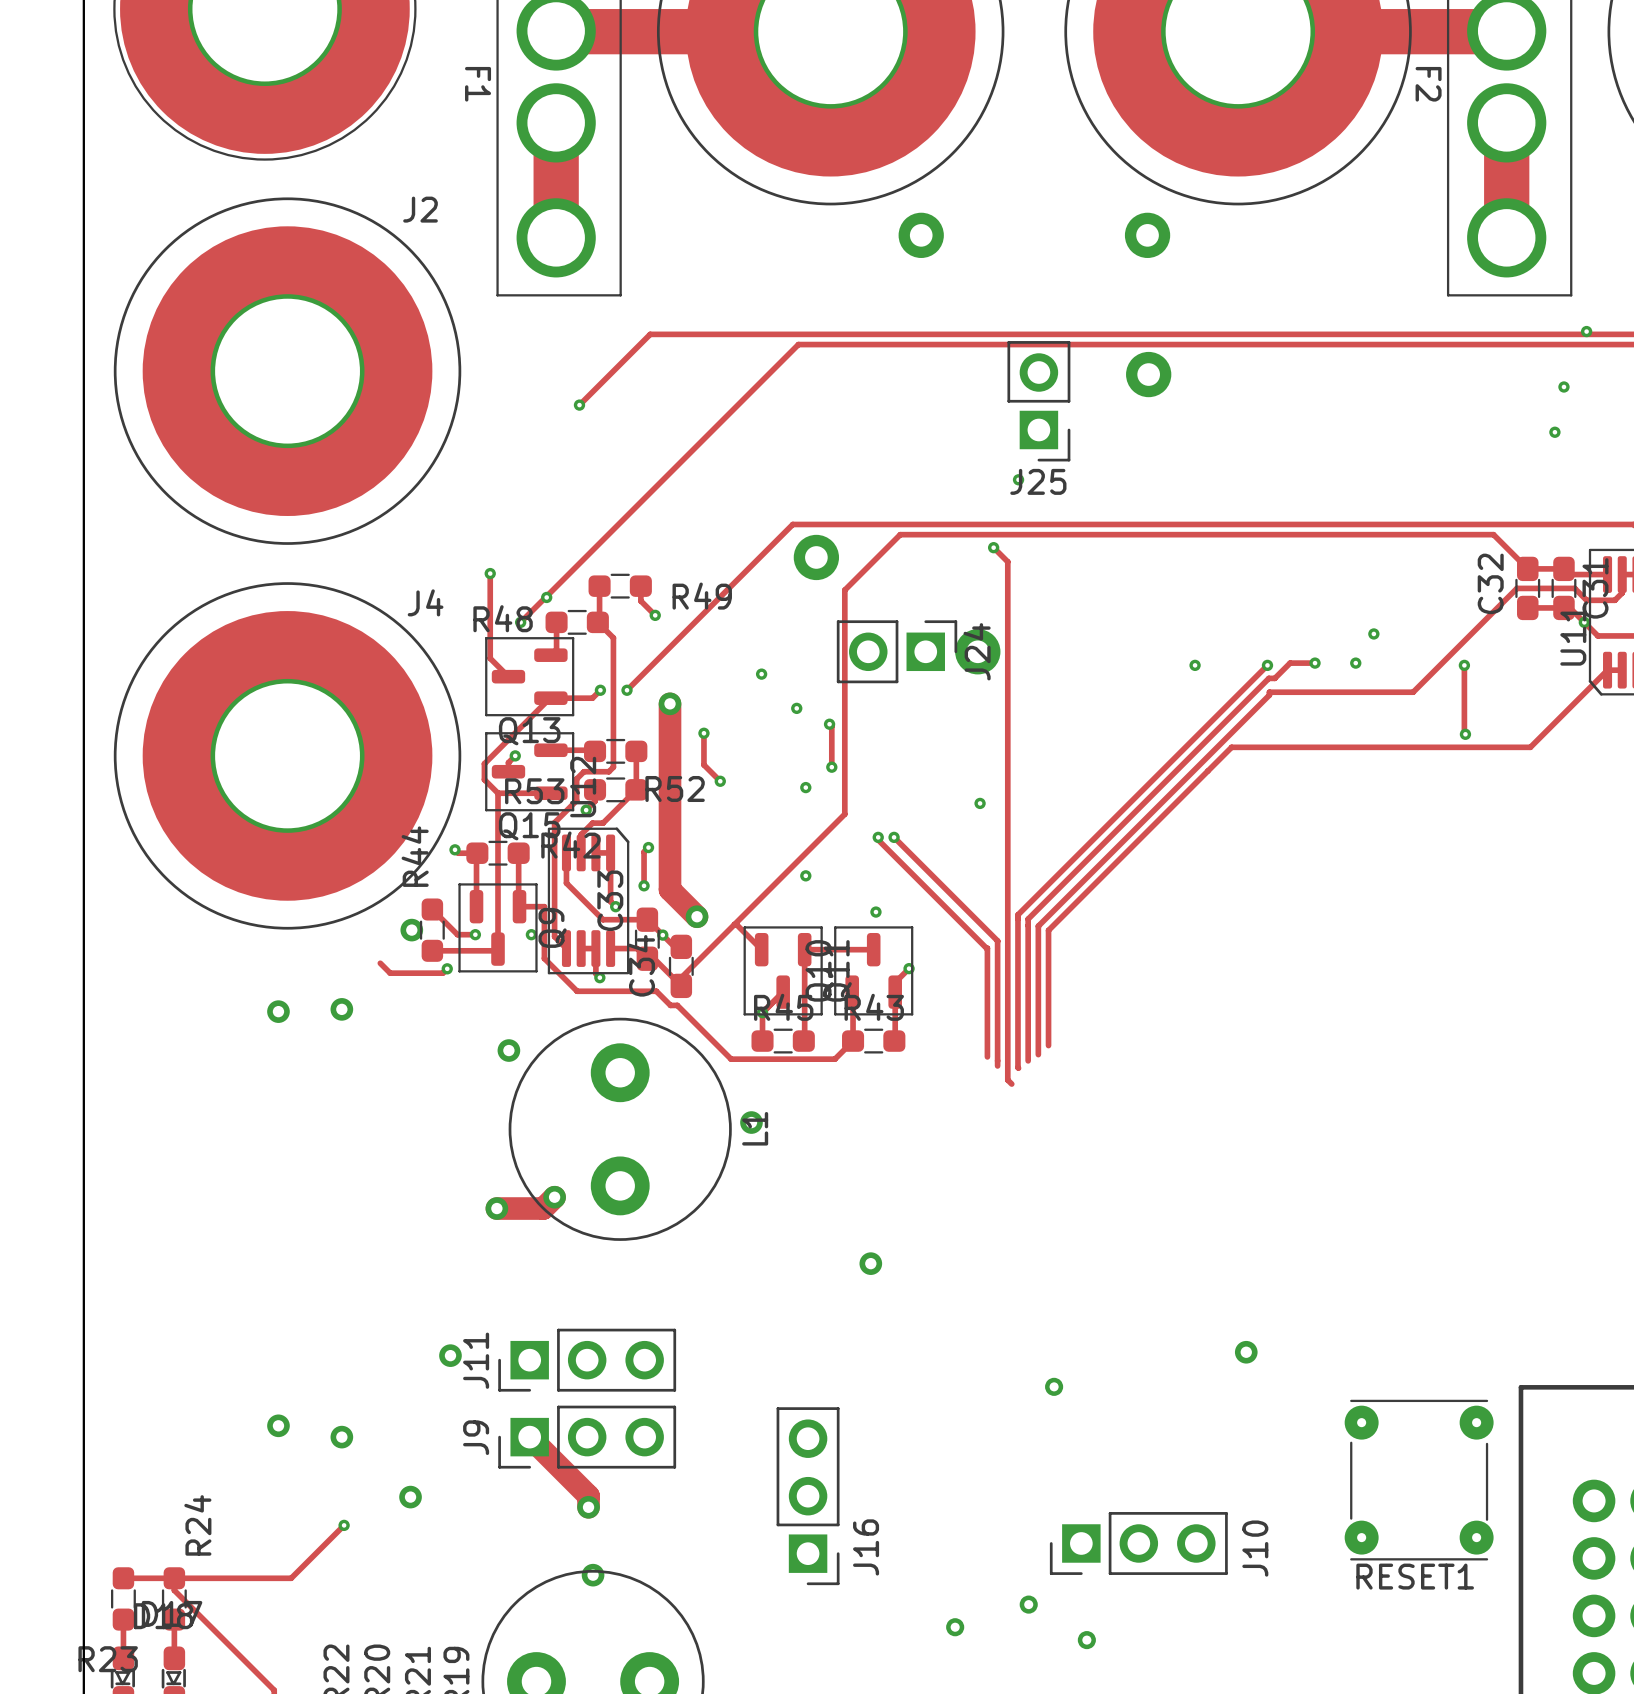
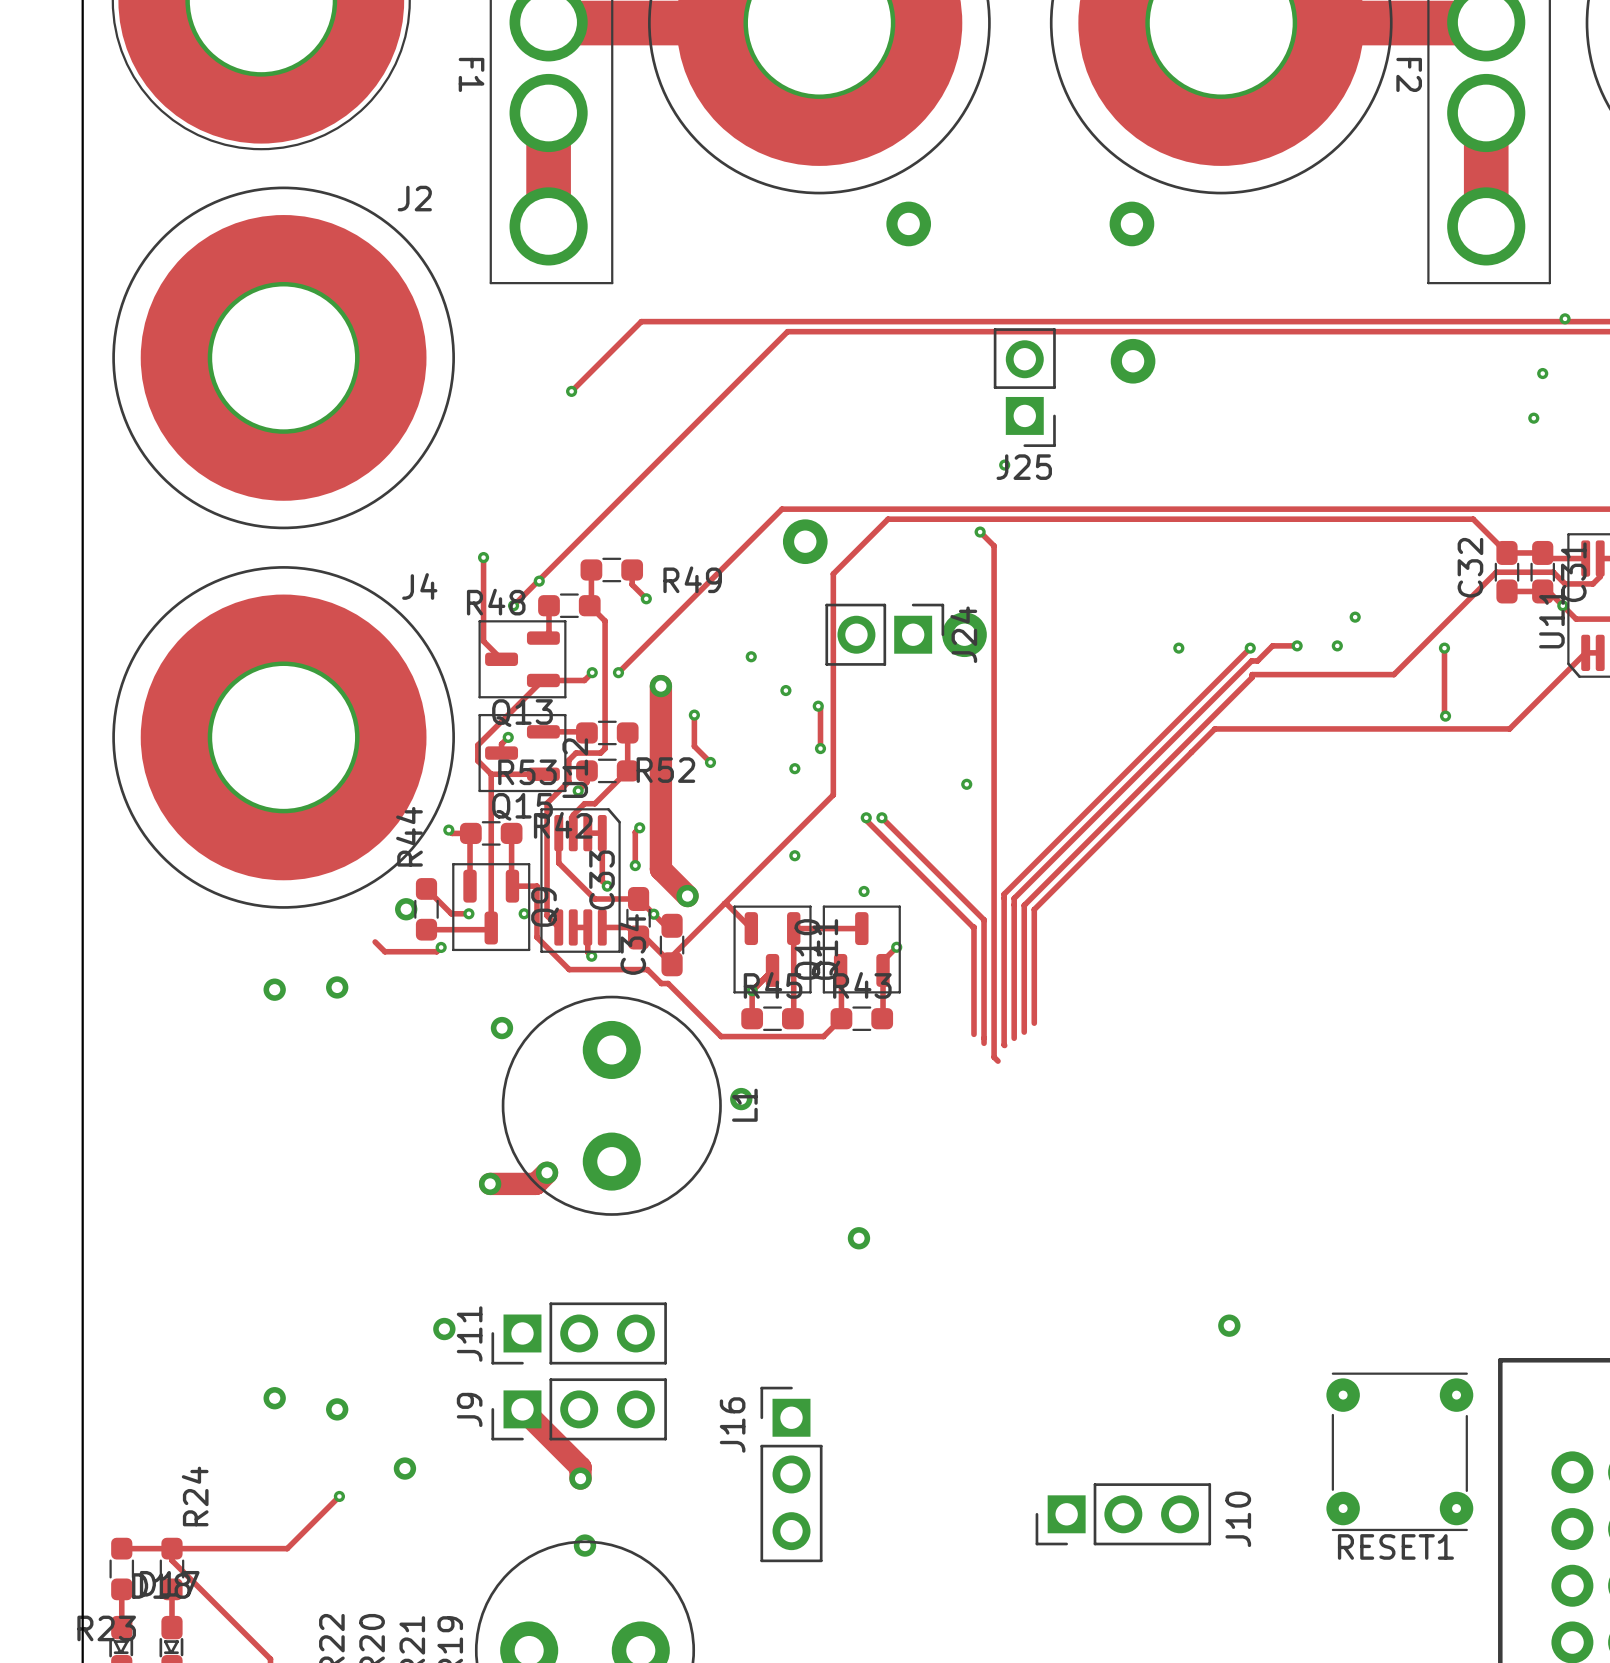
via: (1054, 1386) -> none
J16 rotation: 0° (808, 1496) -> 180° (791, 1474)
via: (1028, 1604) -> none
via: (955, 1627) -> none
via: (1086, 1640) -> none

